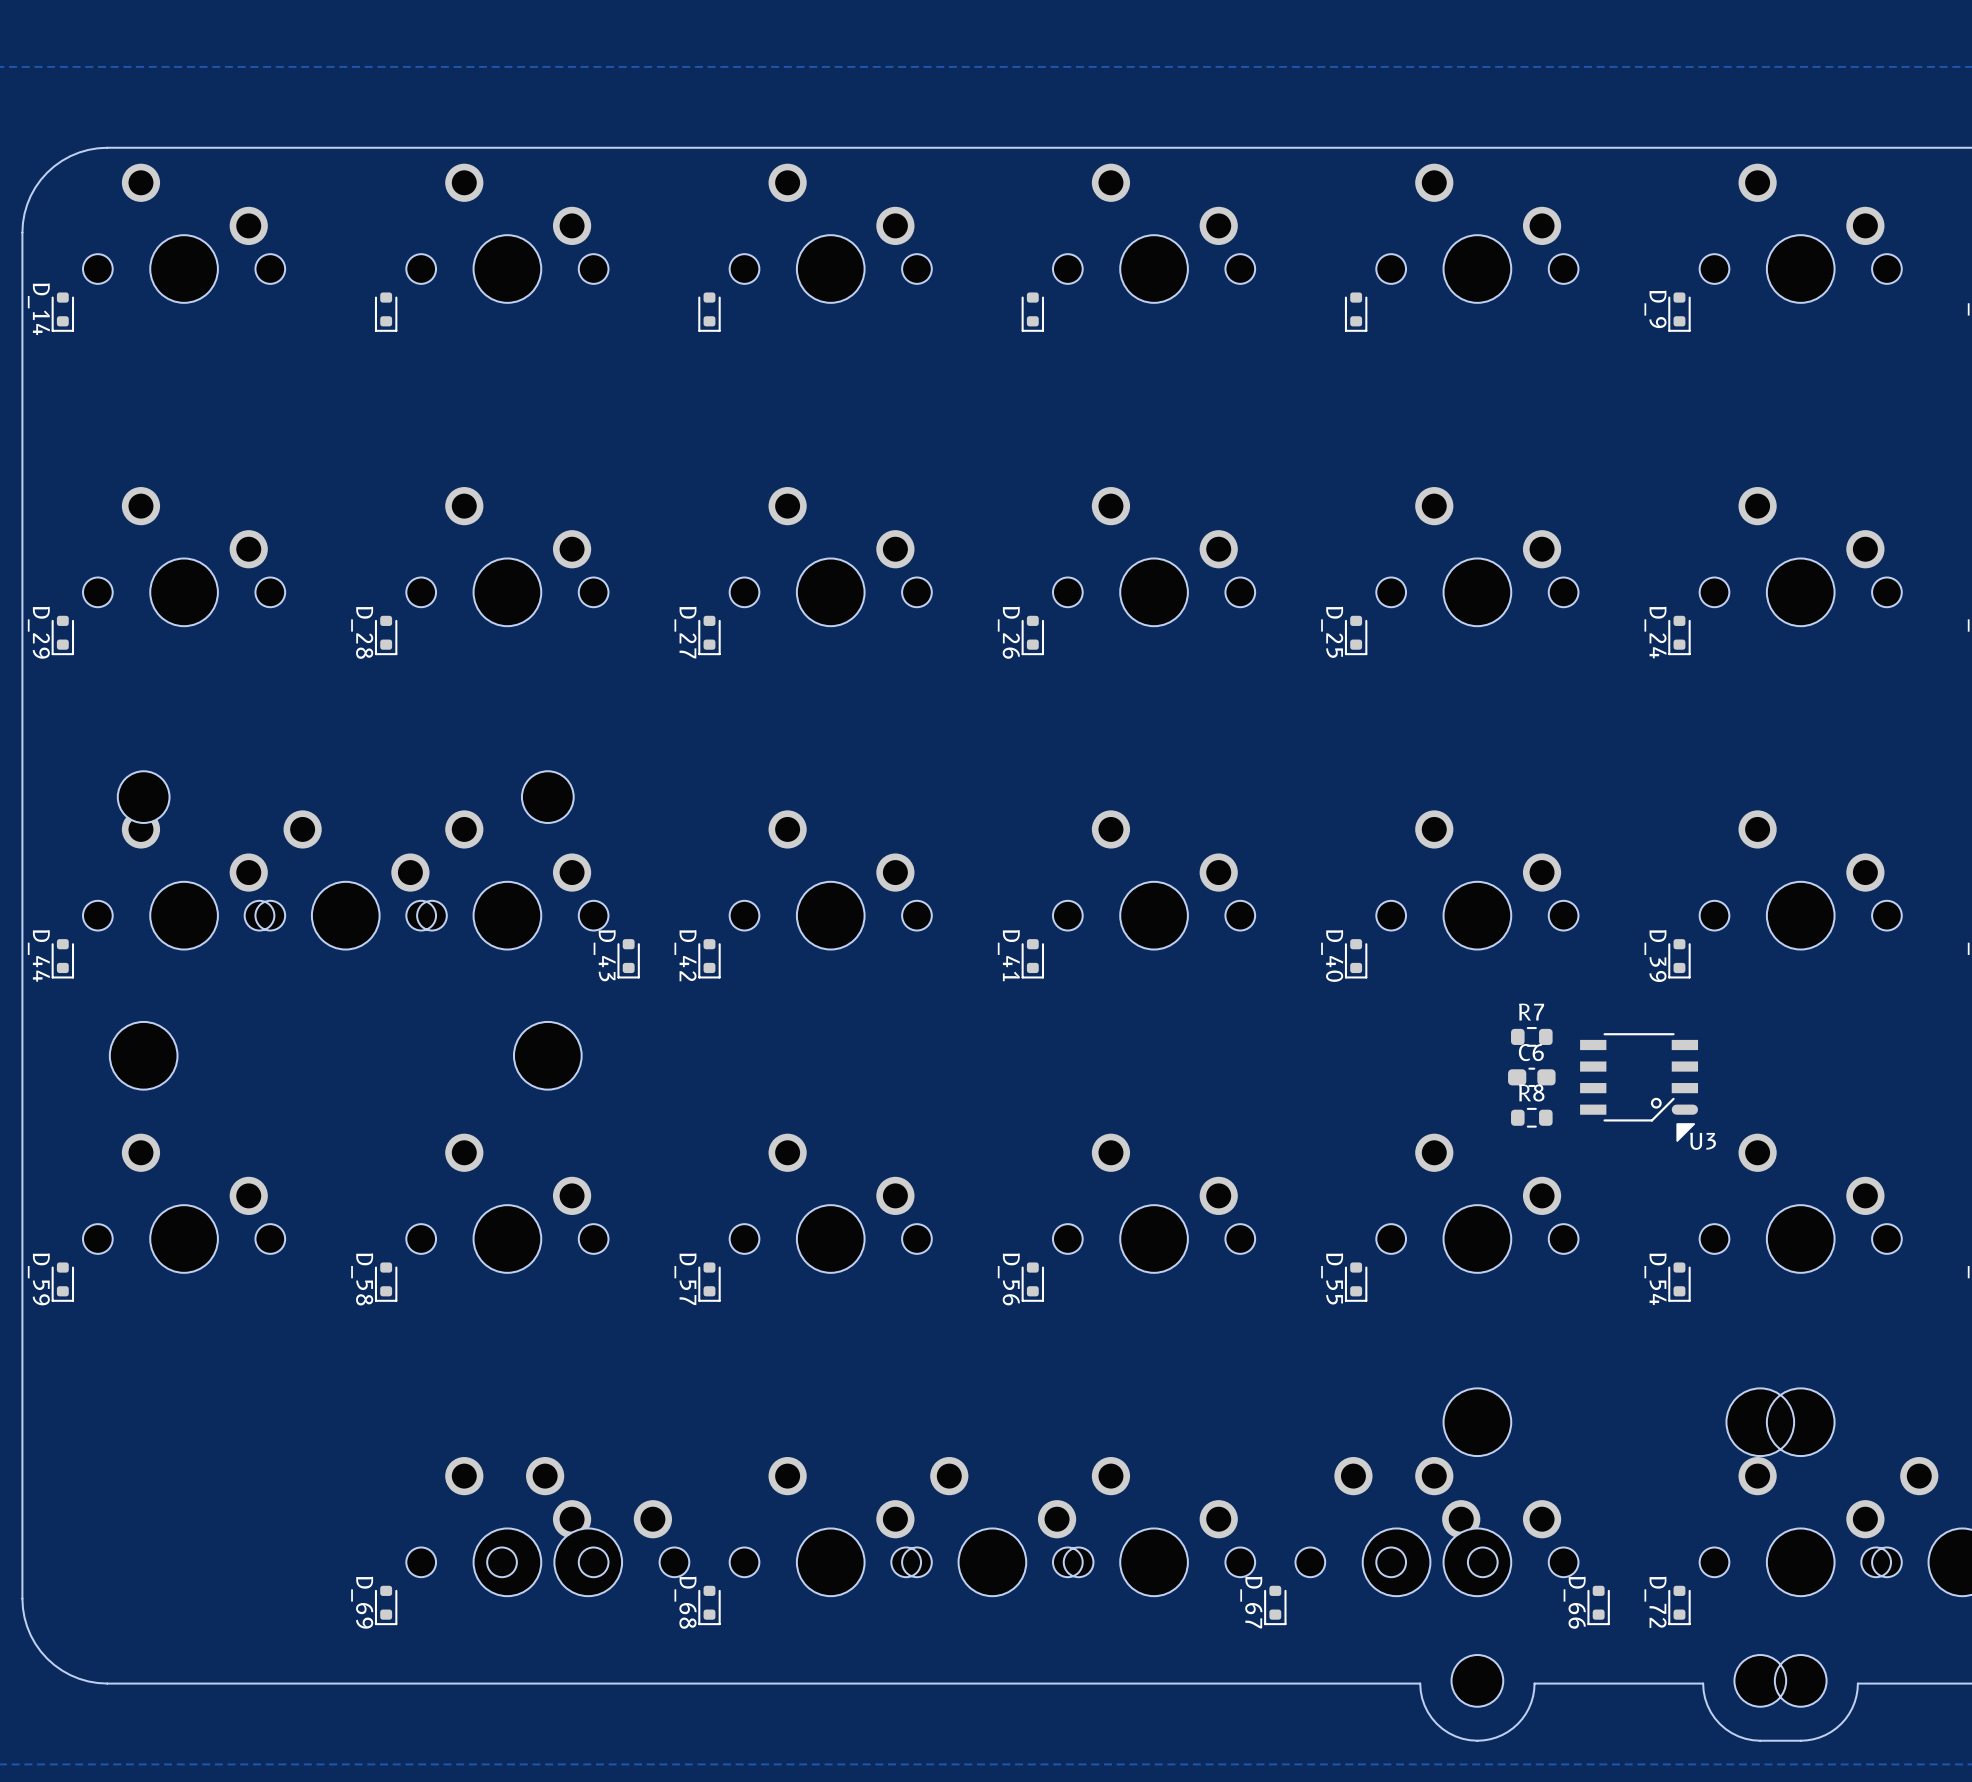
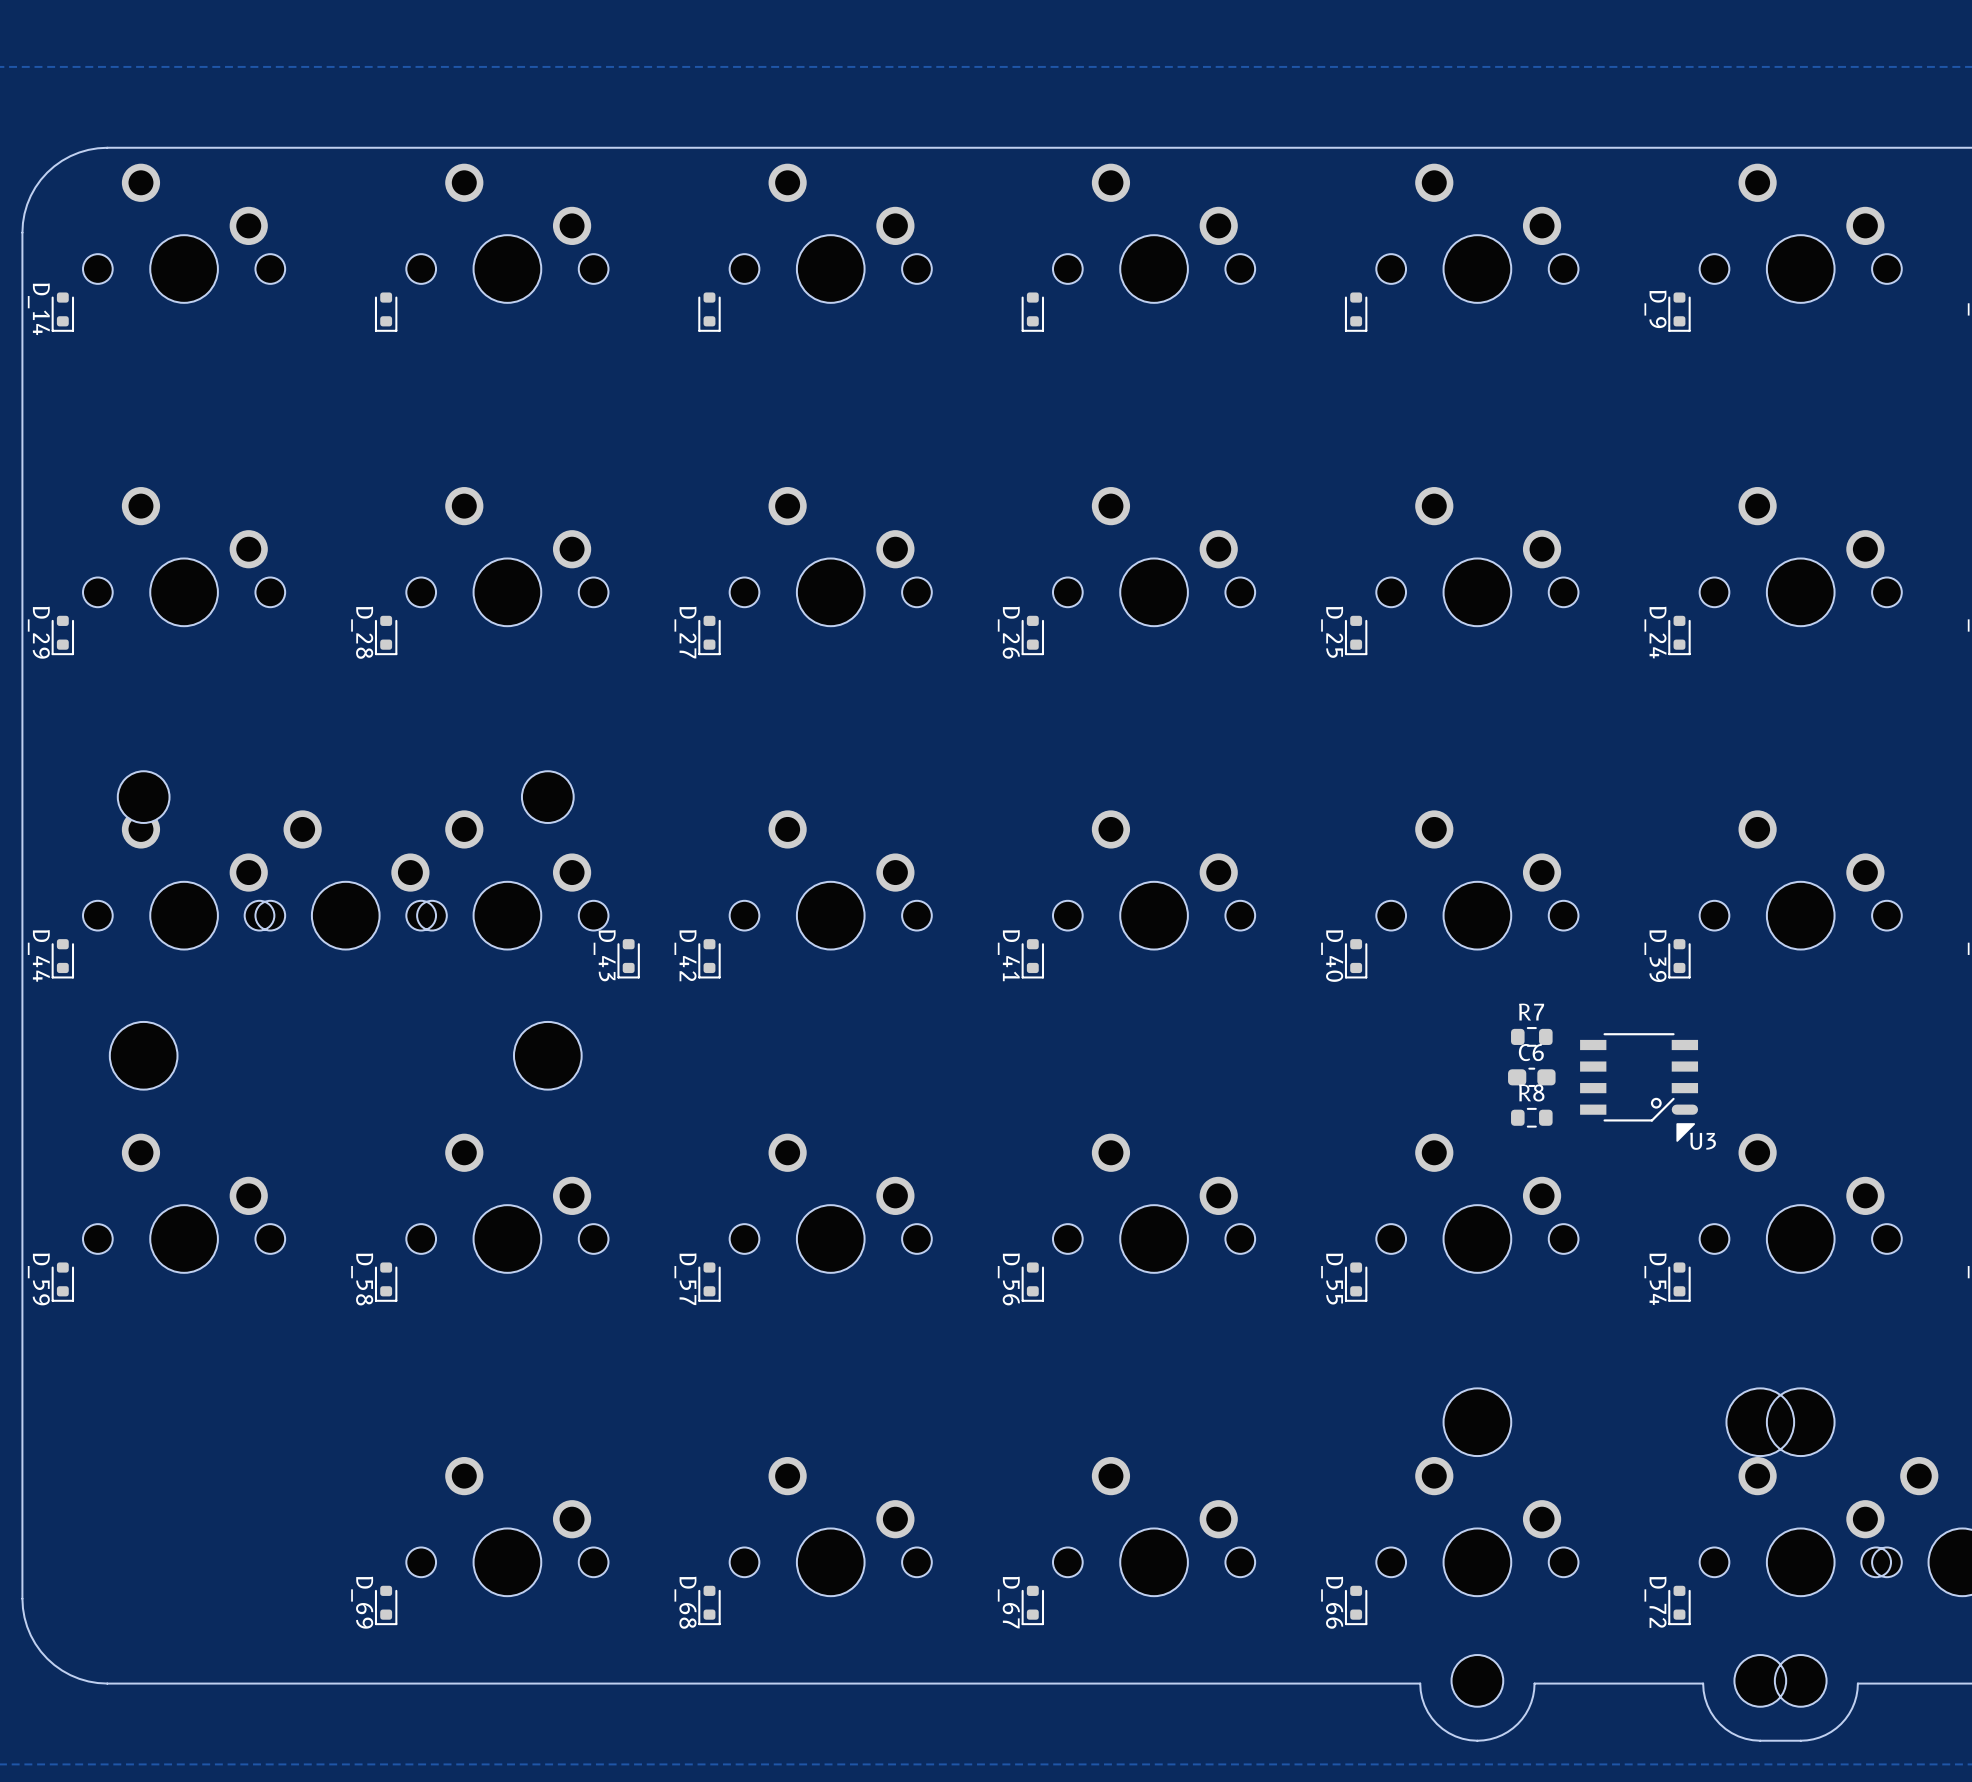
part: (588, 1526) -> none
part: (992, 1526) -> none
part: (1396, 1526) -> none
D_67 position: (1275, 1605) -> (1032, 1605)
D_66 position: (1598, 1605) -> (1356, 1605)

